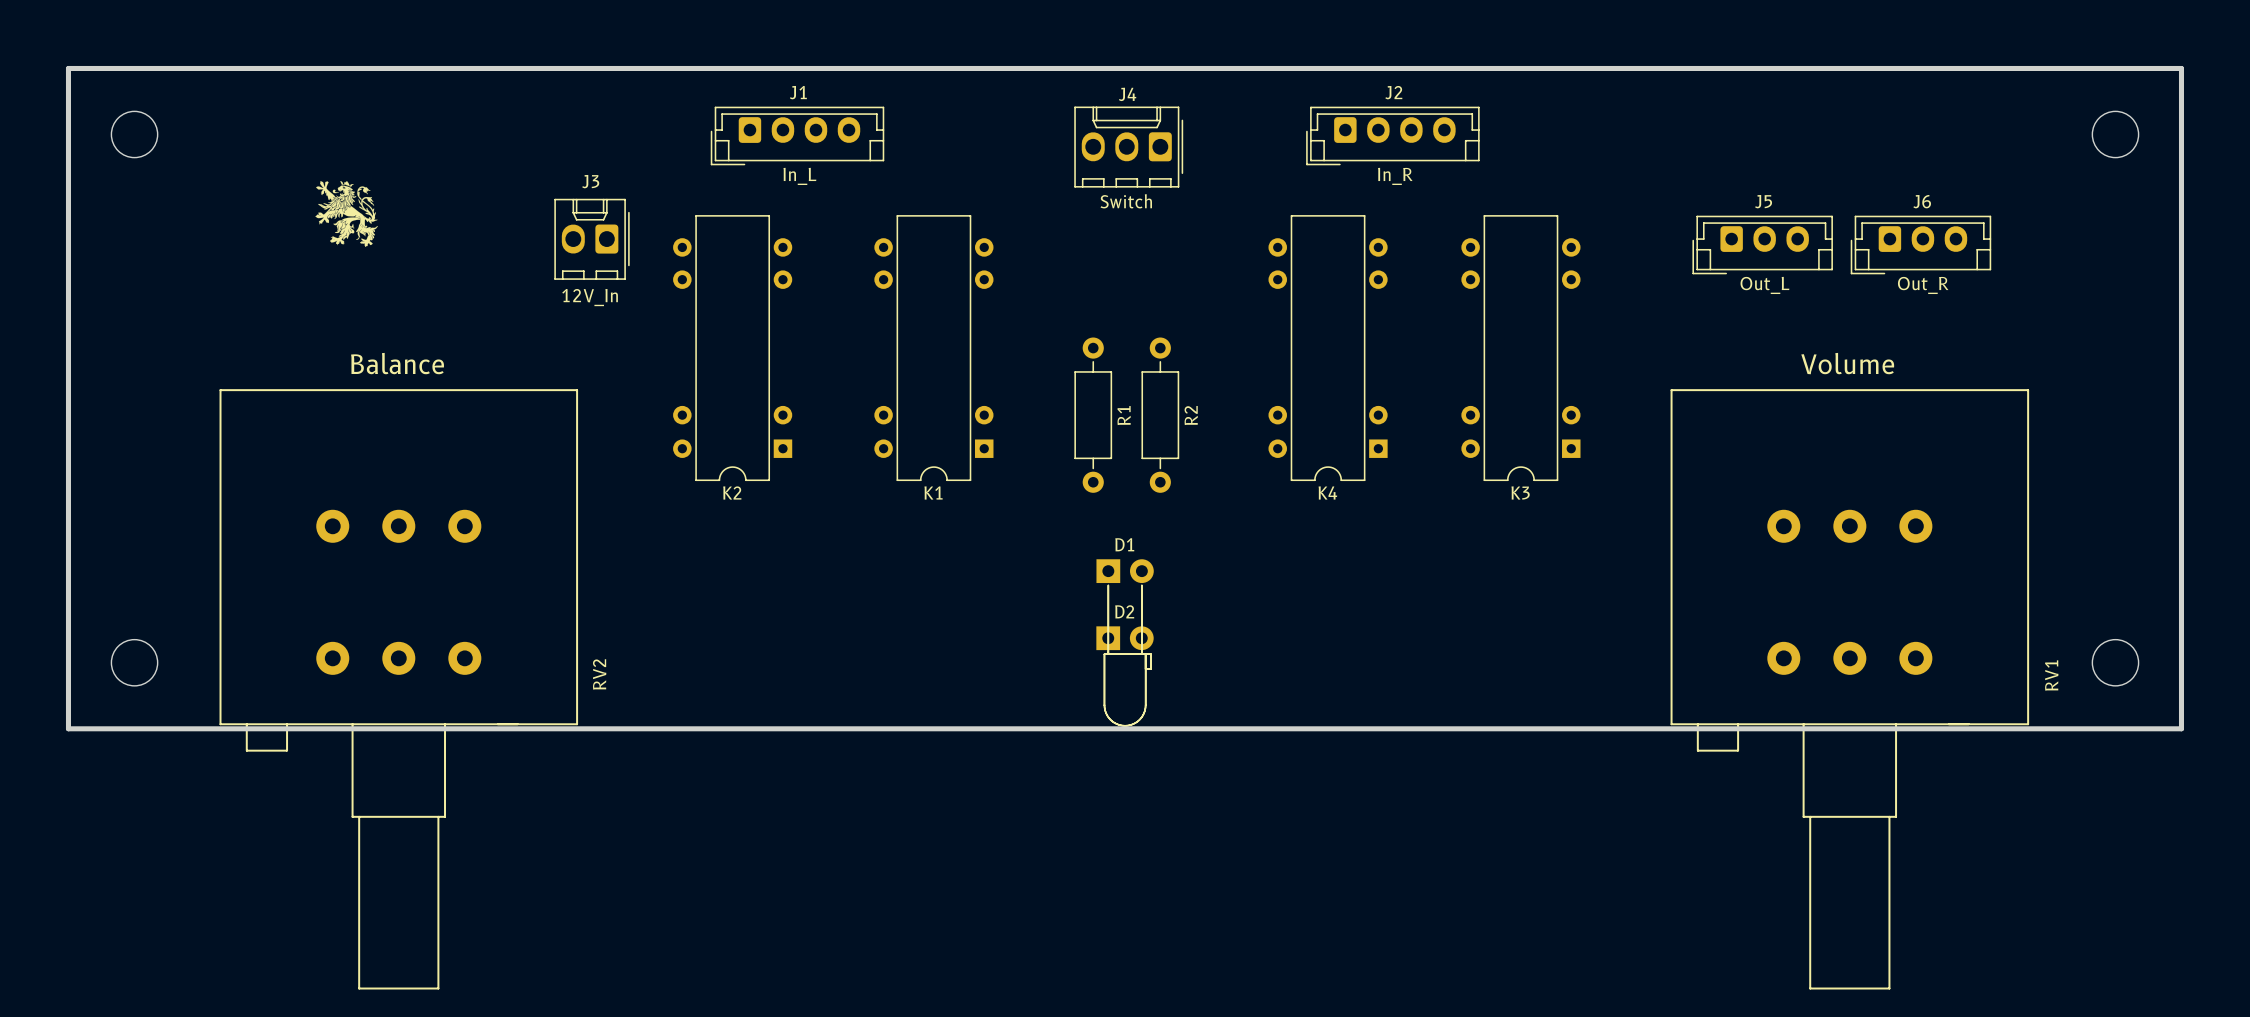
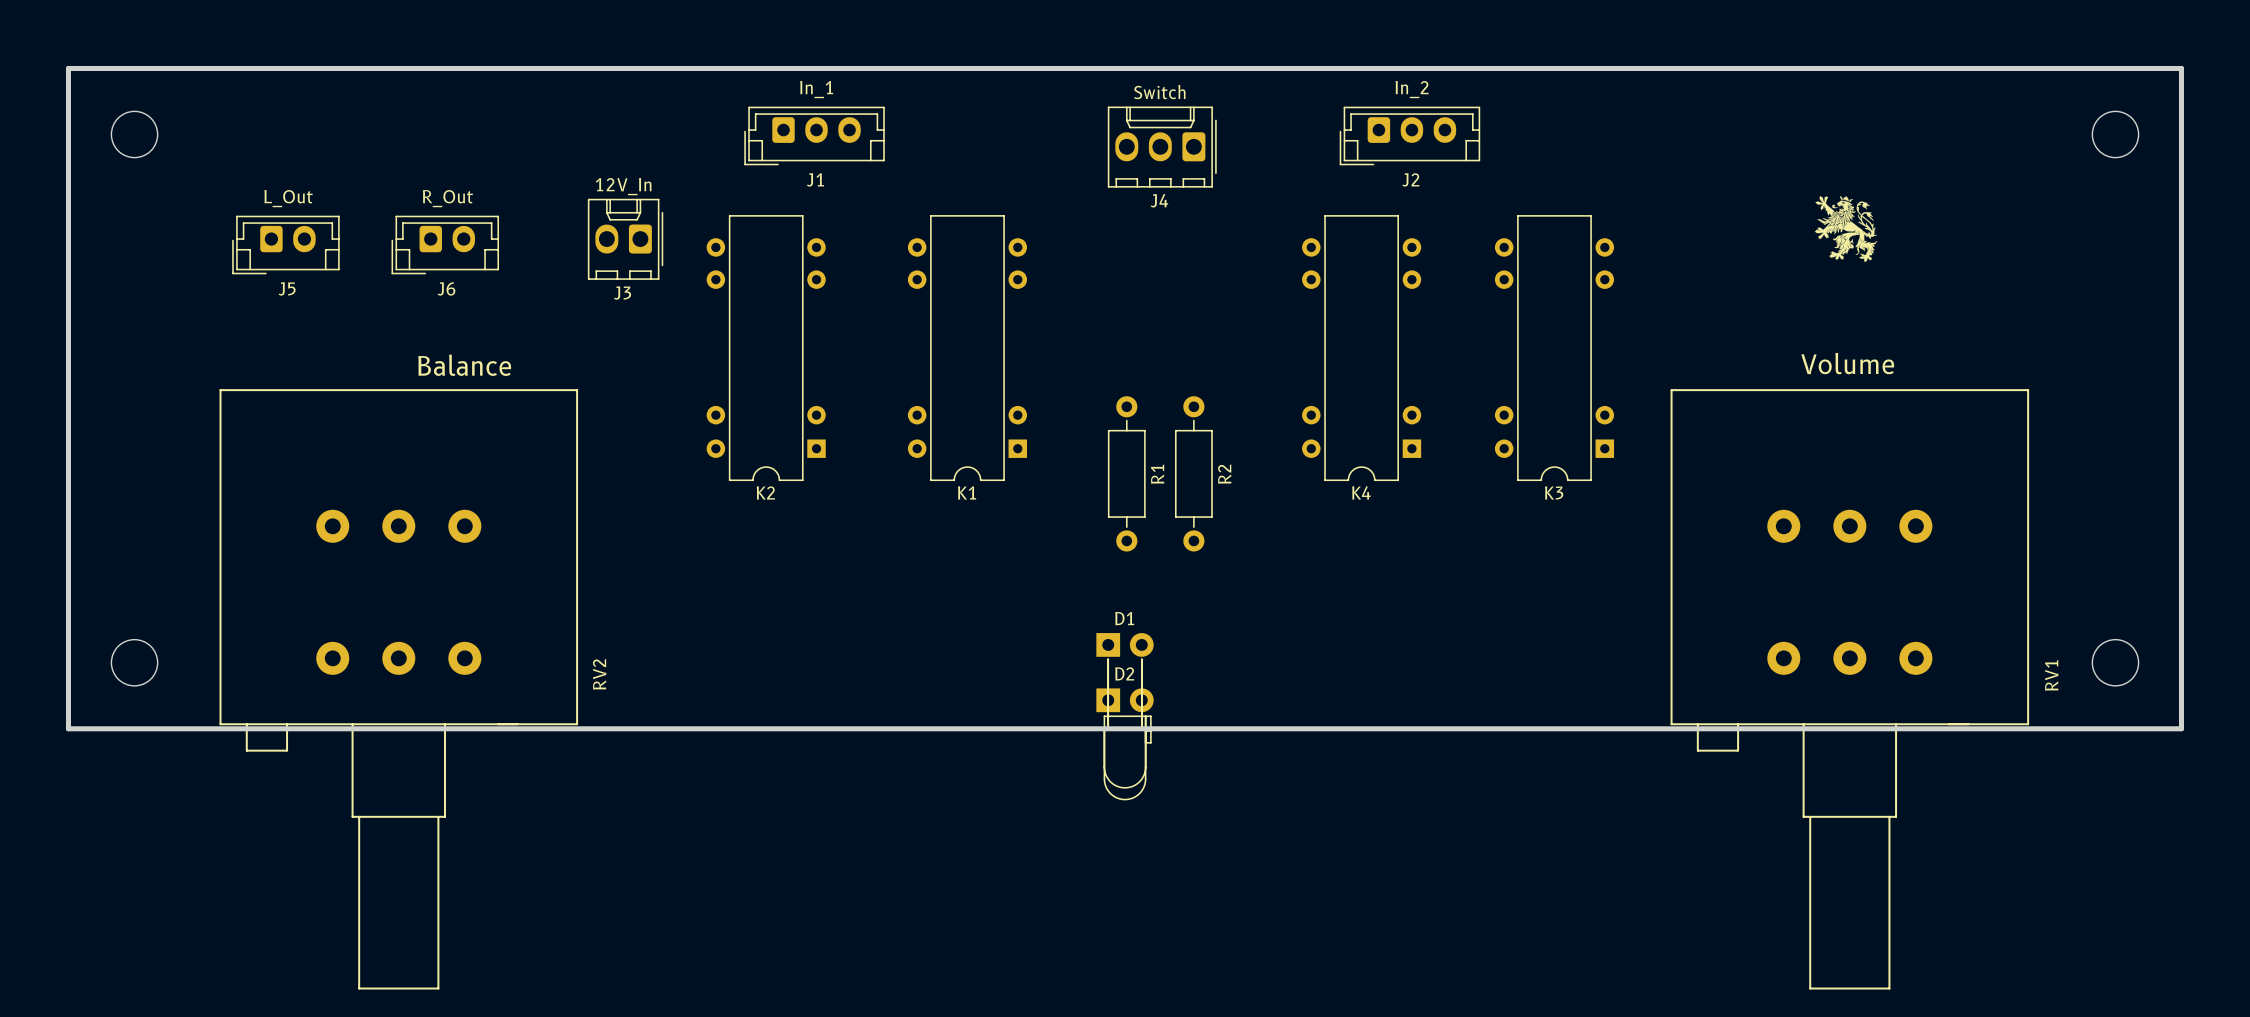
J1 name position: J1 (798, 92) -> J1 (815, 179)
J2 name position: J2 (1393, 92) -> J2 (1410, 179)
J4 name position: J4 (1127, 94) -> J4 (1159, 200)
J1 footprint: [710, 106, 885, 166] -> [744, 106, 885, 166]
J2 footprint: [1306, 106, 1480, 166] -> [1339, 106, 1481, 166]
J4 position: (1128, 147) -> (1162, 147)
J1 value: In_L (799, 176) -> In_1 (816, 89)
J2 value: In_R (1395, 176) -> In_2 (1412, 89)
drawing: [315, 180, 378, 247] -> none
J3 name position: J3 (590, 181) -> J3 (622, 293)
drawing: none -> [1814, 196, 1878, 263]
J4 value position: Switch (1126, 201) -> Switch (1159, 92)
J5 name position: J5 (1763, 201) -> J5 (287, 288)
J6 name position: J6 (1922, 201) -> J6 (446, 288)
J5 footprint: [1692, 215, 1833, 275] -> [232, 215, 340, 275]
J6 footprint: [1850, 215, 1992, 275] -> [391, 215, 500, 275]
J3 position: (592, 239) -> (625, 239)
J5 value: Out_L (1764, 285) -> L_Out (288, 198)
J6 value: Out_R (1923, 285) -> R_Out (447, 198)
J3 value position: 12V_In (590, 297) -> 12V_In (623, 186)
K2 position: (732, 348) -> (766, 348)
K1 position: (933, 348) -> (967, 348)
K4 position: (1328, 348) -> (1361, 348)
K3 position: (1520, 348) -> (1554, 348)
text position: Balance (397, 363) -> Balance (464, 365)
R1 position: (1093, 415) -> (1126, 473)
R2 position: (1160, 415) -> (1193, 473)
D1 position: (1125, 642) -> (1125, 716)
D2 position: (1125, 676) -> (1125, 738)

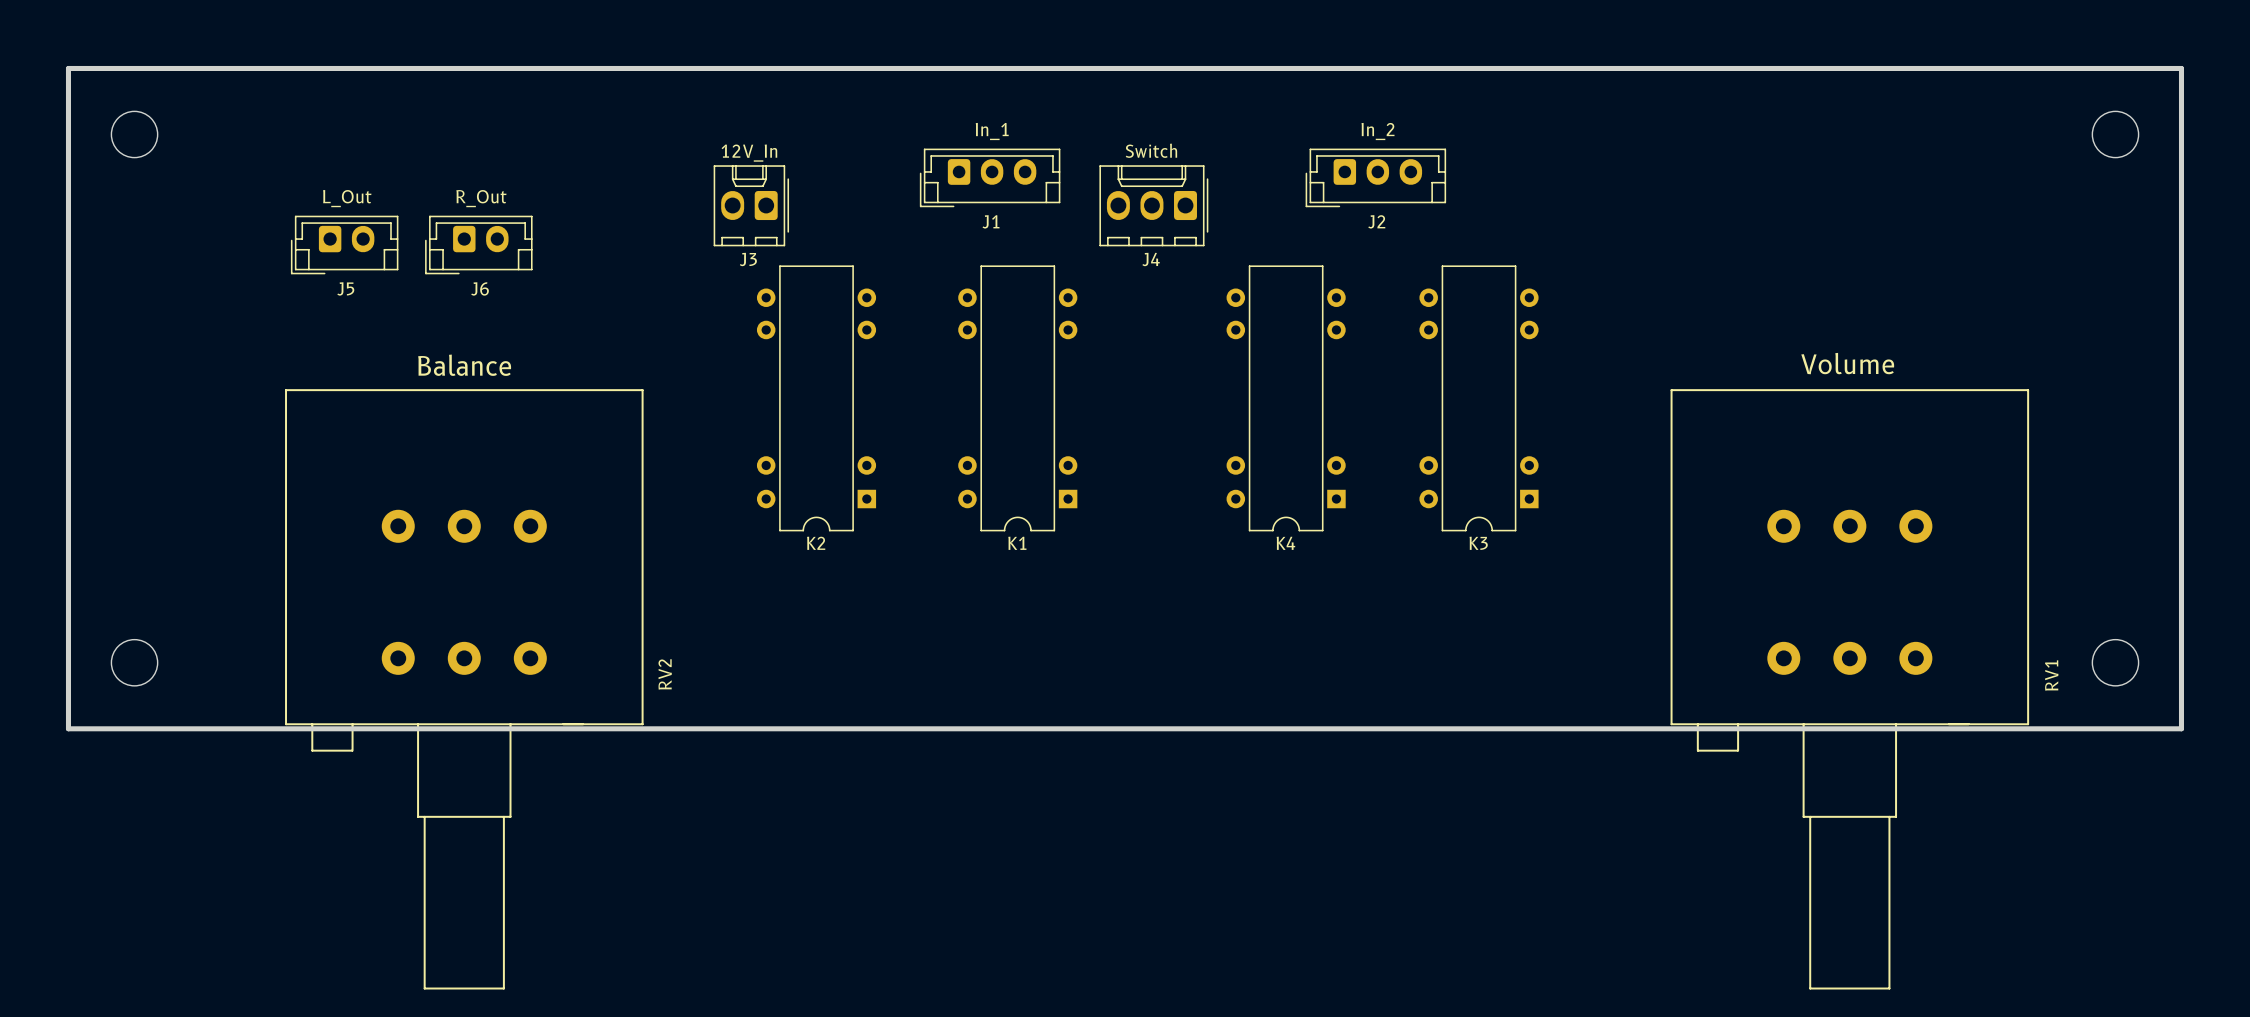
J1 position: (814, 135) -> (990, 177)
J2 position: (1409, 135) -> (1375, 177)
J4 position: (1162, 147) -> (1153, 205)
drawing: [1814, 196, 1878, 263] -> none
J3 position: (625, 239) -> (751, 205)
J5 position: (285, 244) -> (344, 244)
J6 position: (445, 244) -> (478, 244)
K2 position: (766, 348) -> (816, 398)
K1 position: (967, 348) -> (1017, 398)
K4 position: (1361, 348) -> (1286, 398)
K3 position: (1554, 348) -> (1479, 398)
R1: (1126, 473) -> none
R2: (1193, 473) -> none
RV2 position: (398, 689) -> (464, 689)
D1: (1125, 716) -> none
D2: (1125, 738) -> none

